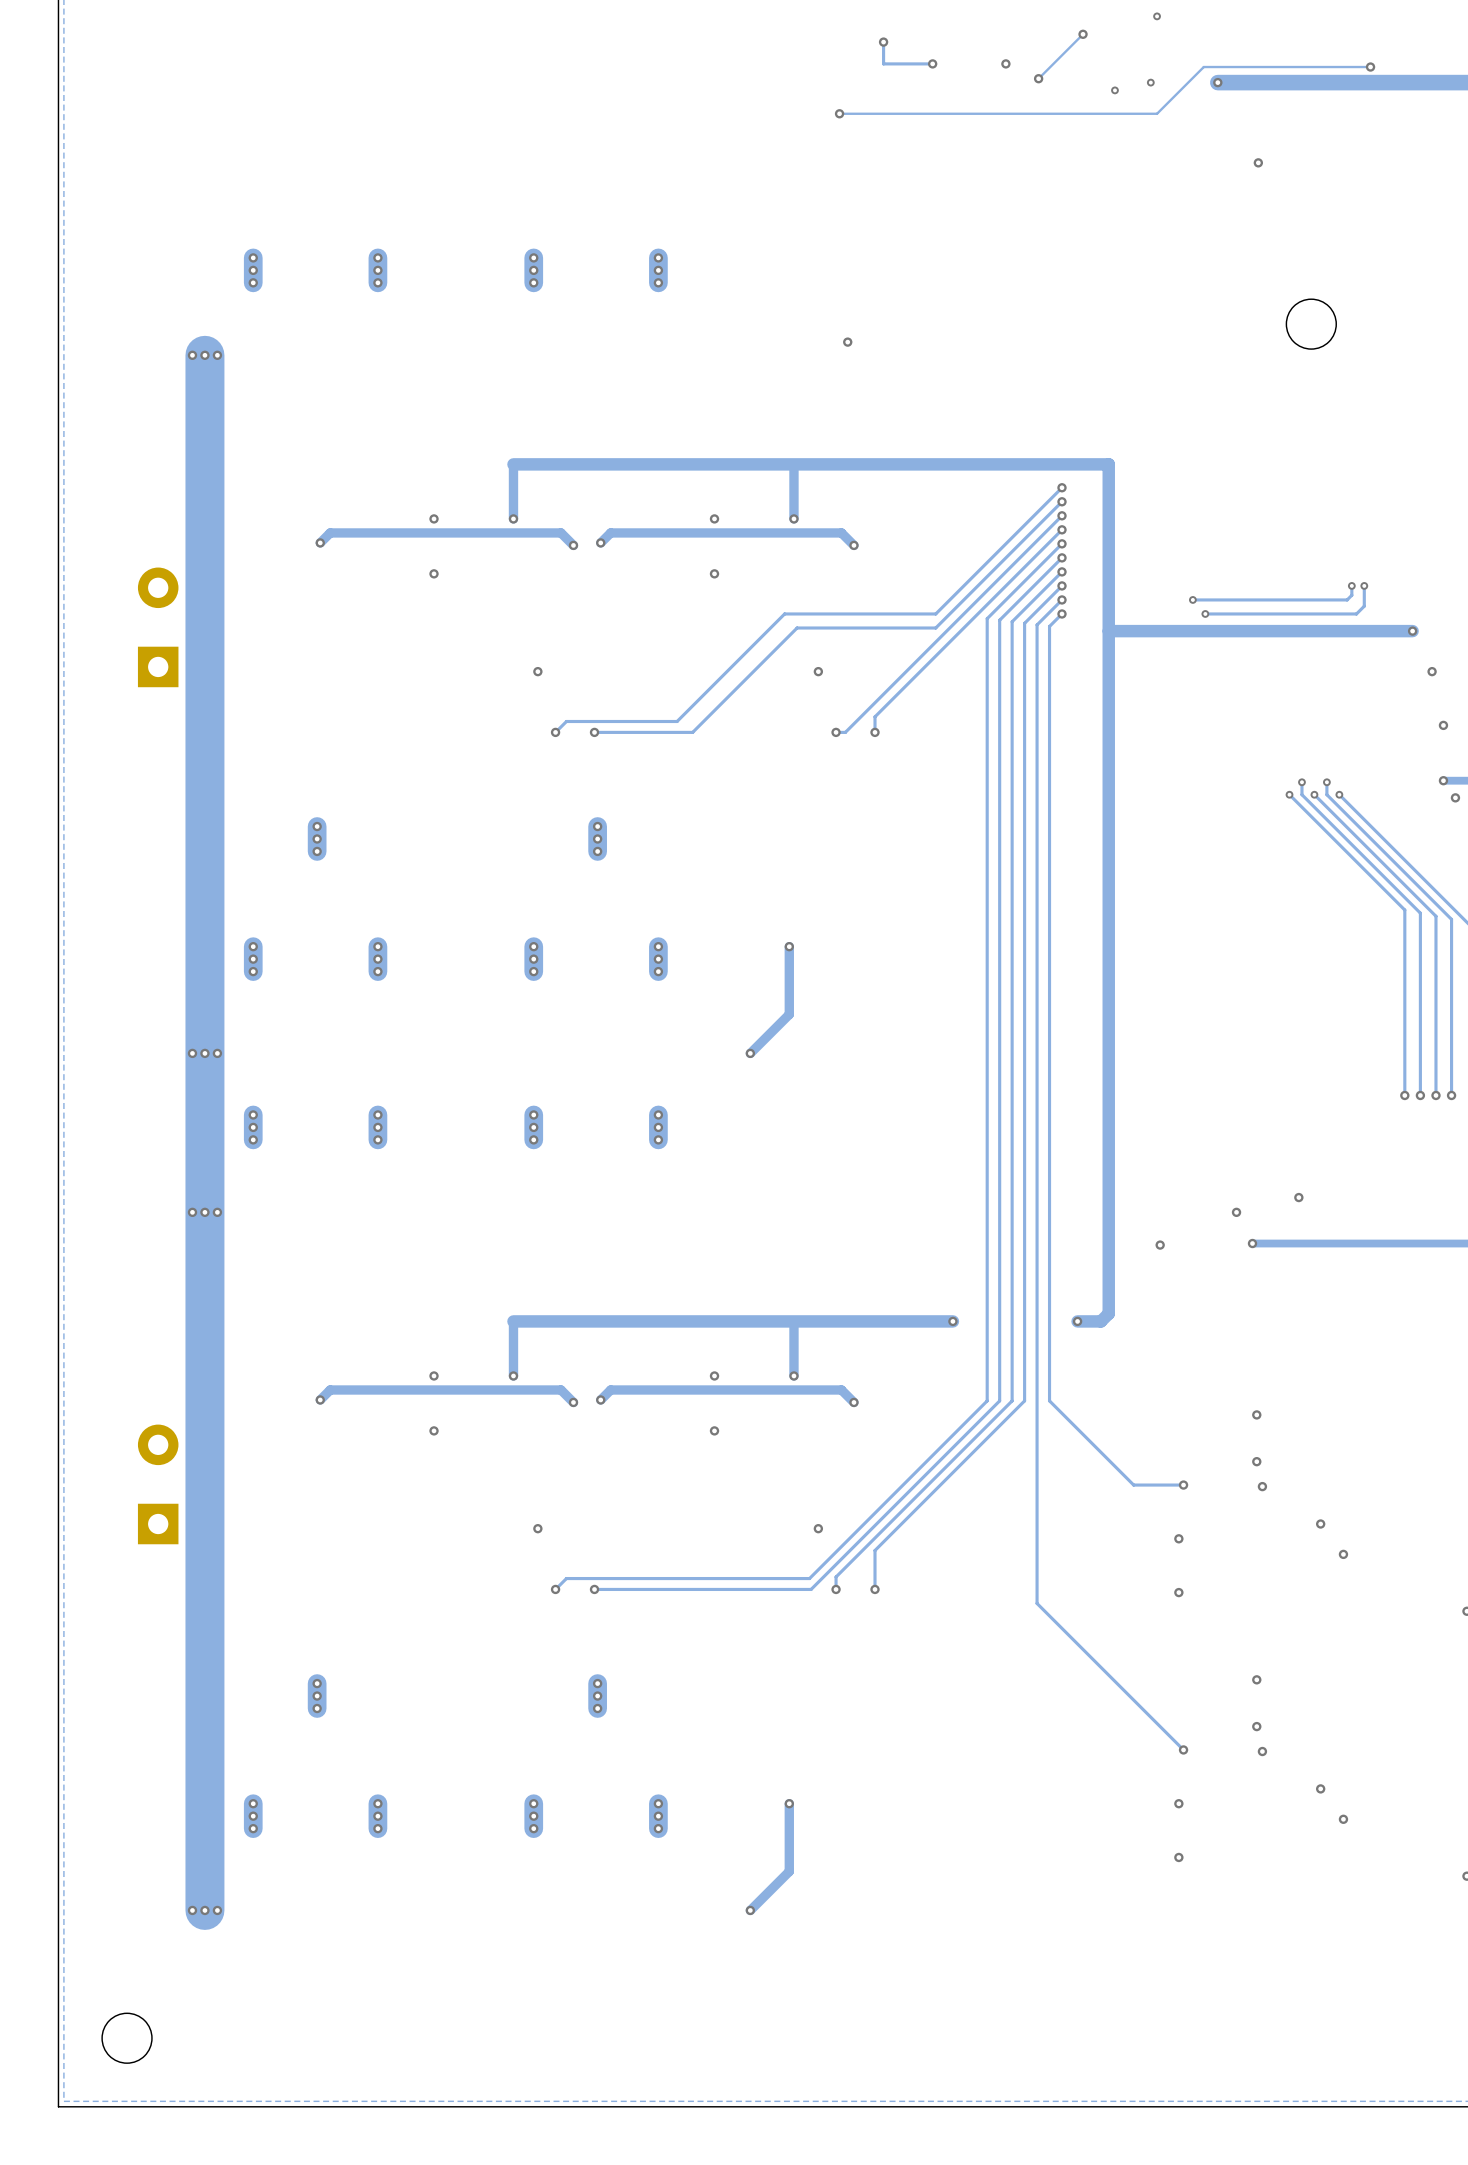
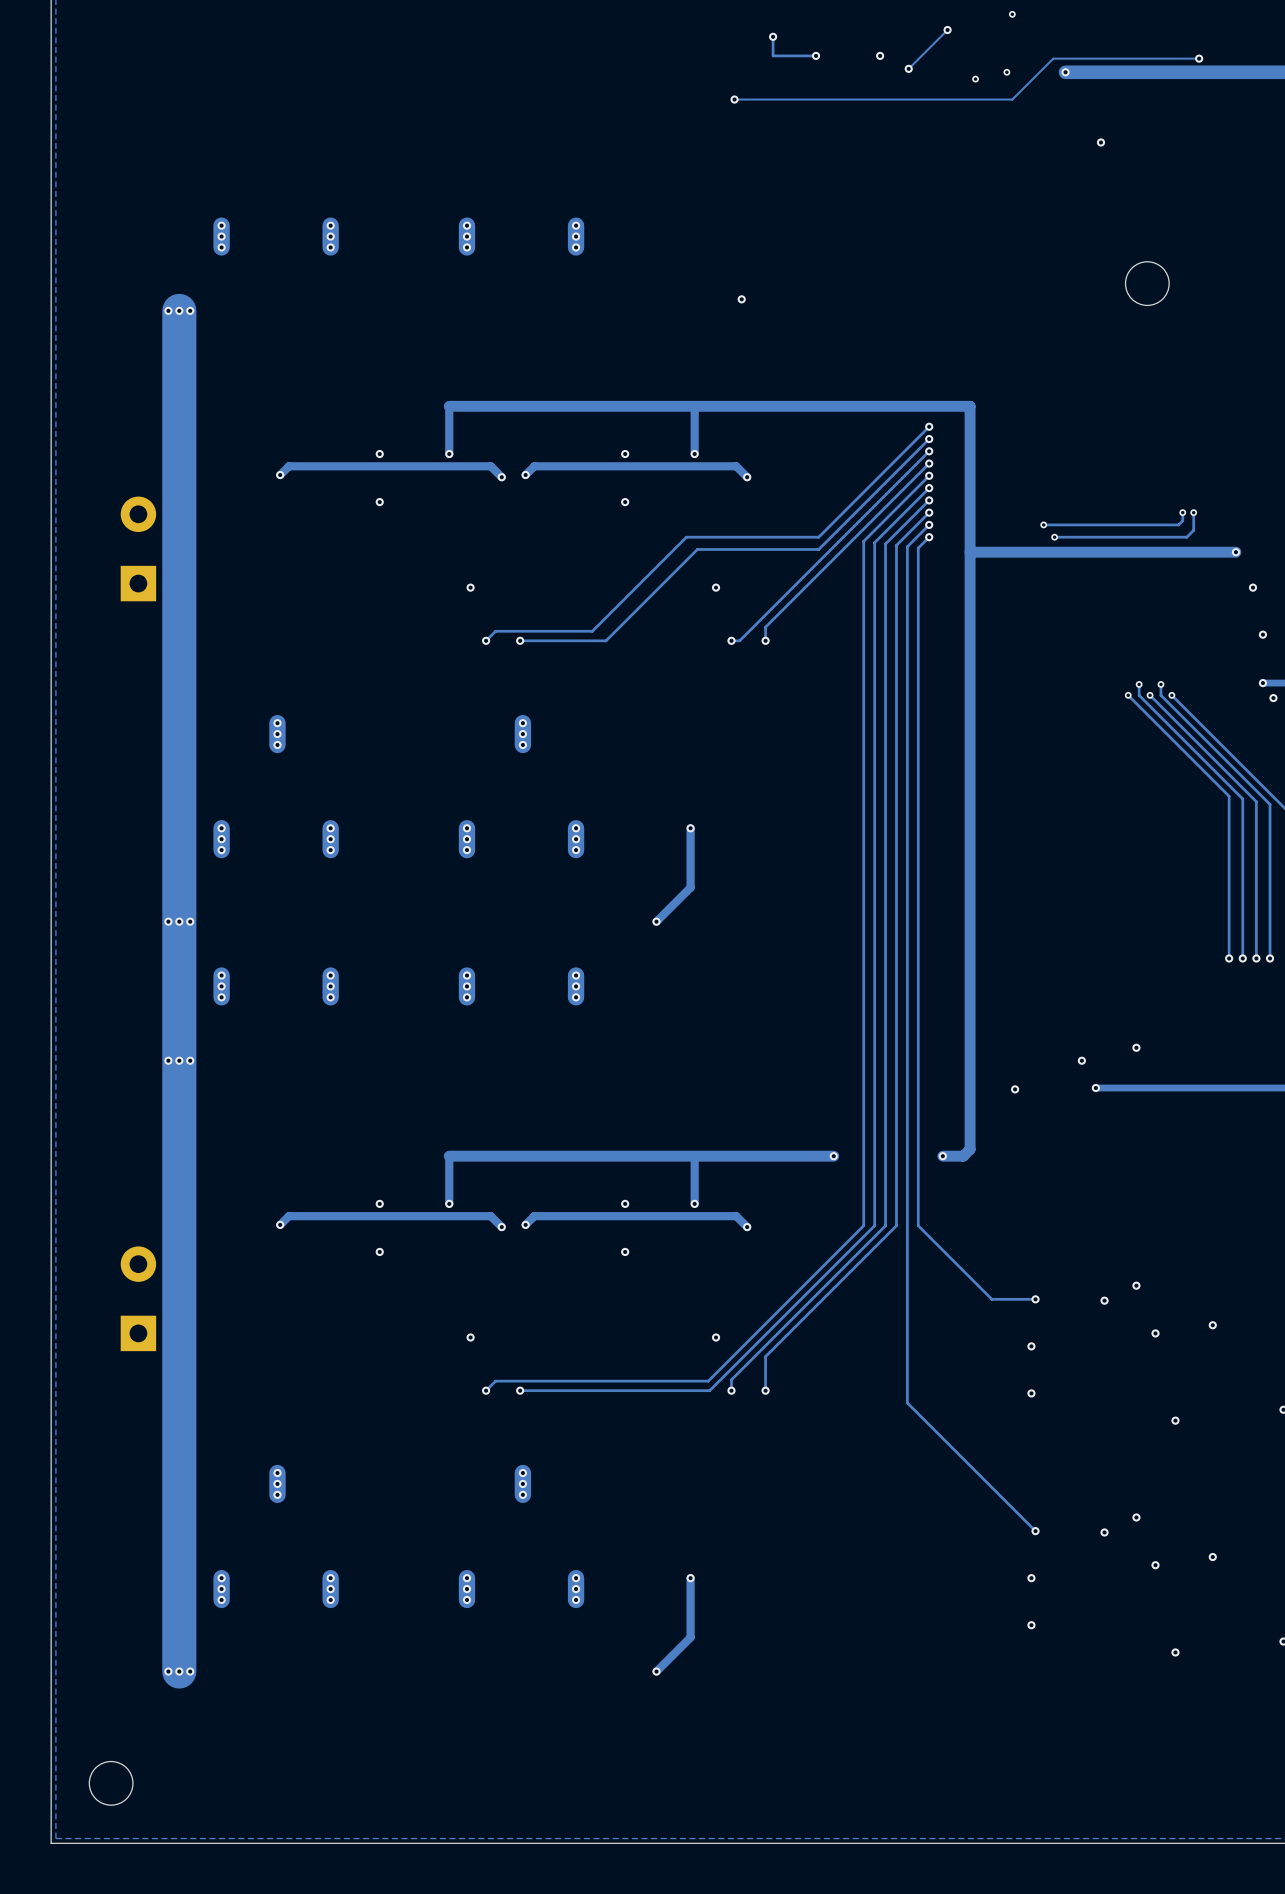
via: (1256, 1414) -> none
via: (1256, 1461) -> none
via: none -> (1136, 1285)
via: none -> (1212, 1325)
via: (1343, 1554) -> none
via: none -> (1175, 1420)
via: (1256, 1679) -> none
via: (1256, 1726) -> none
via: none -> (1136, 1517)
via: none -> (1212, 1557)
via: (1343, 1819) -> none
via: none -> (1175, 1652)

